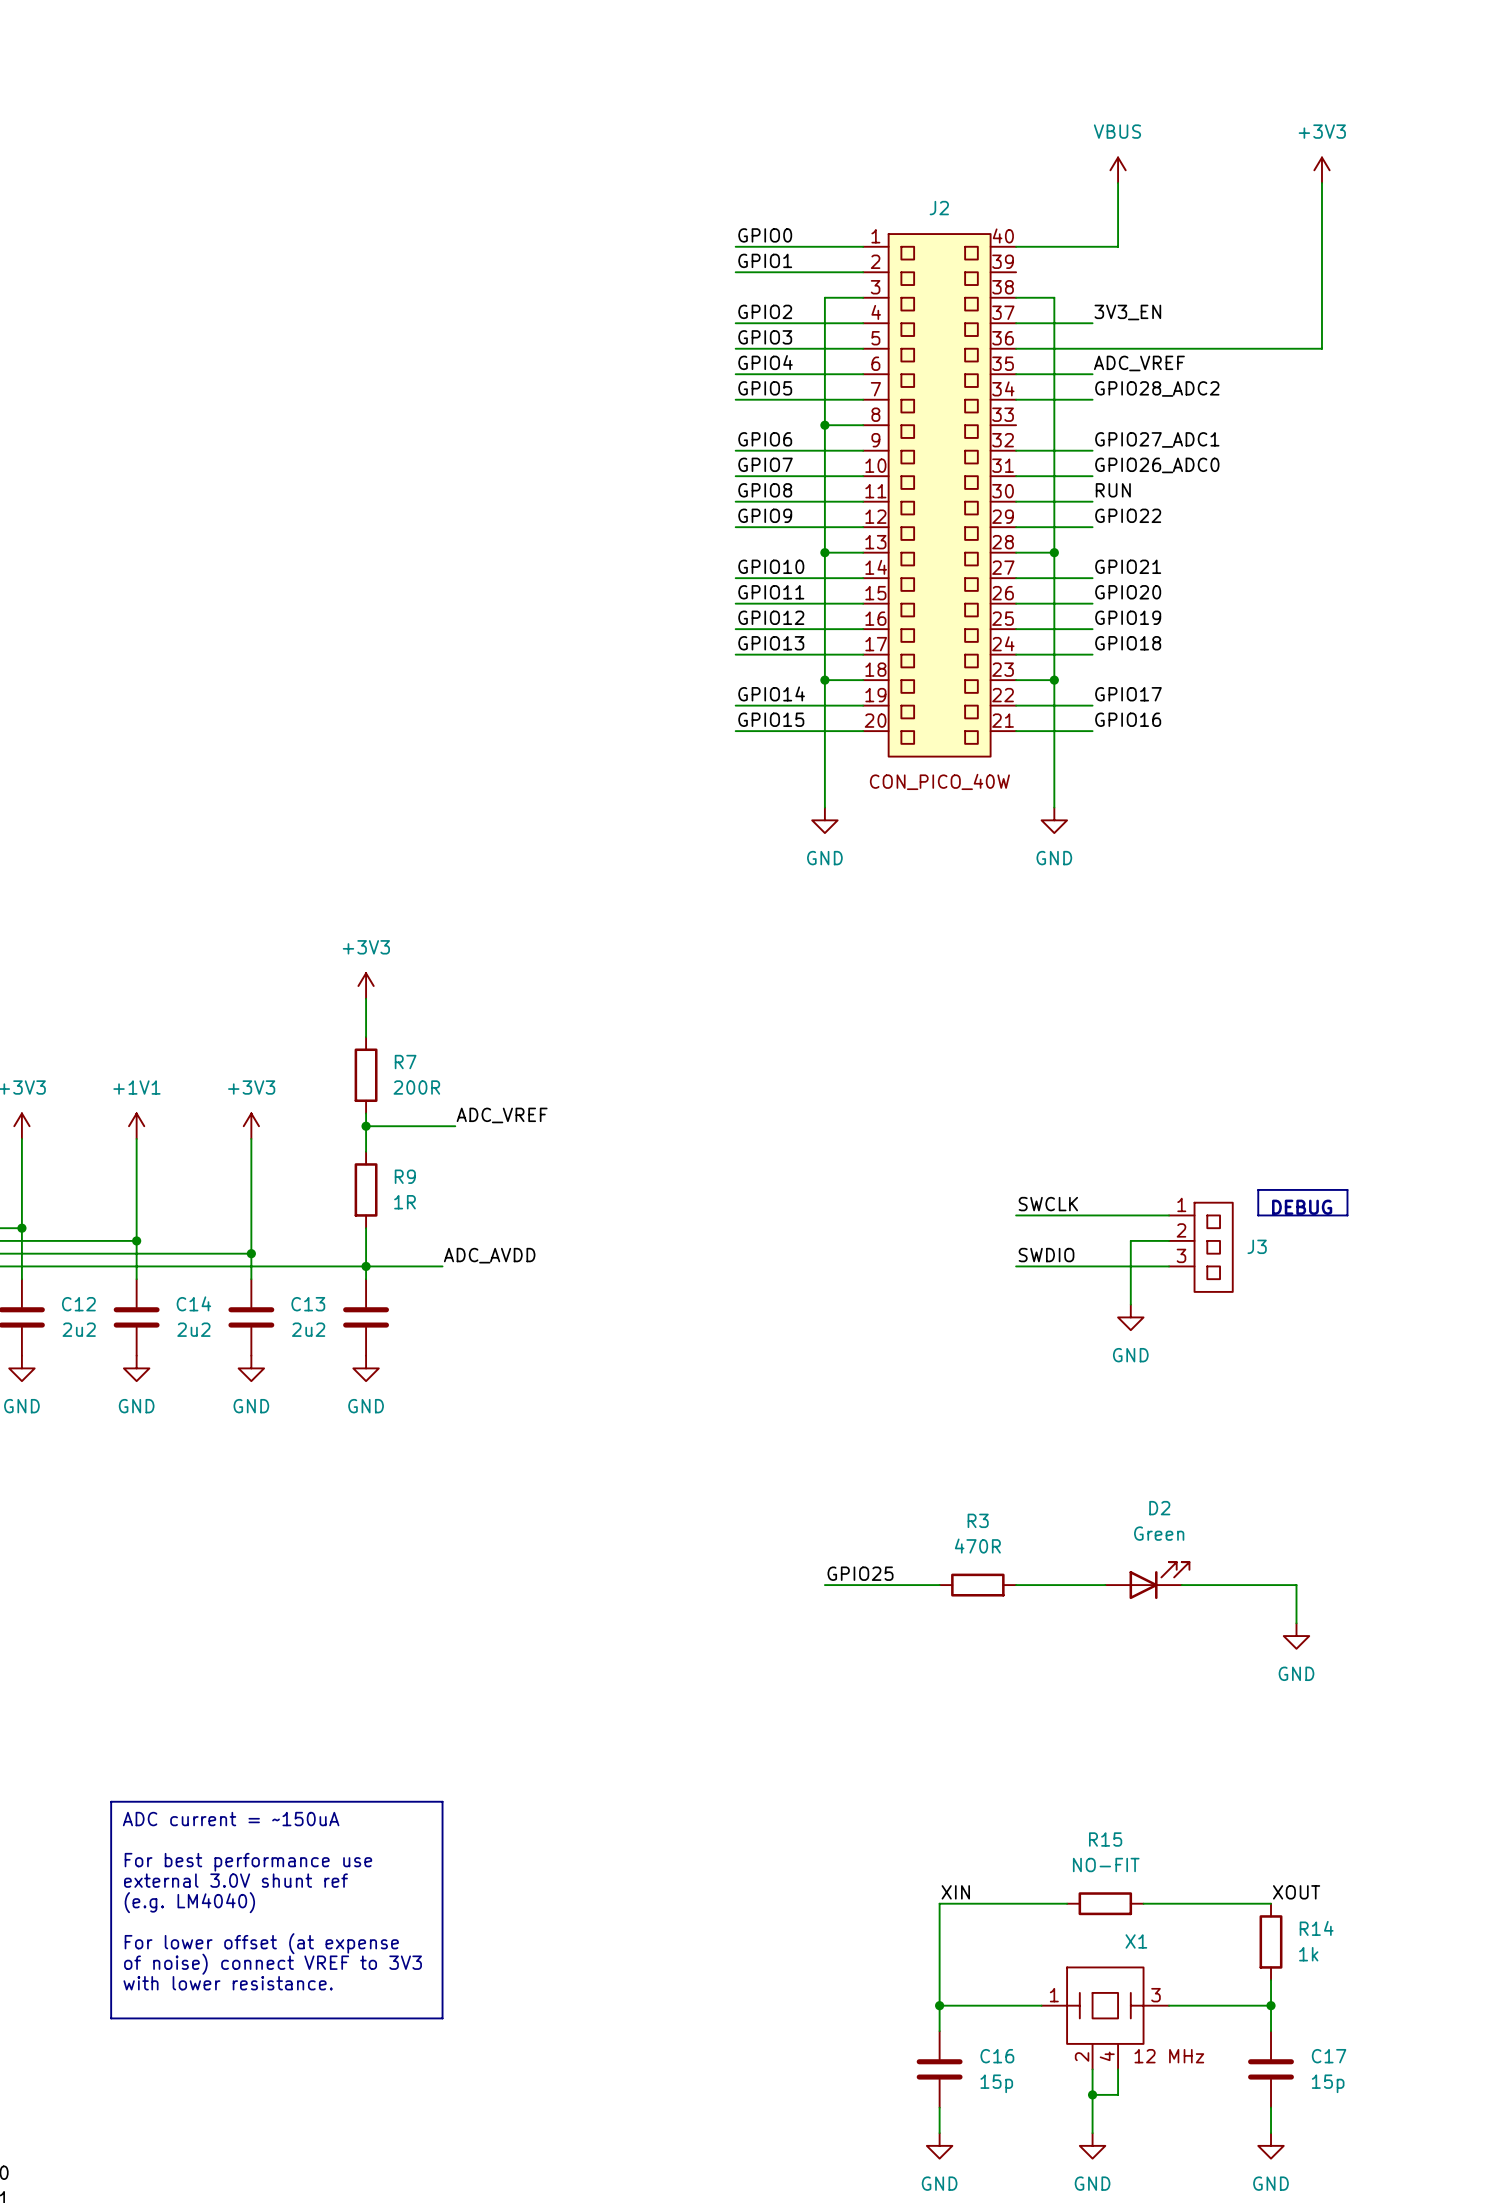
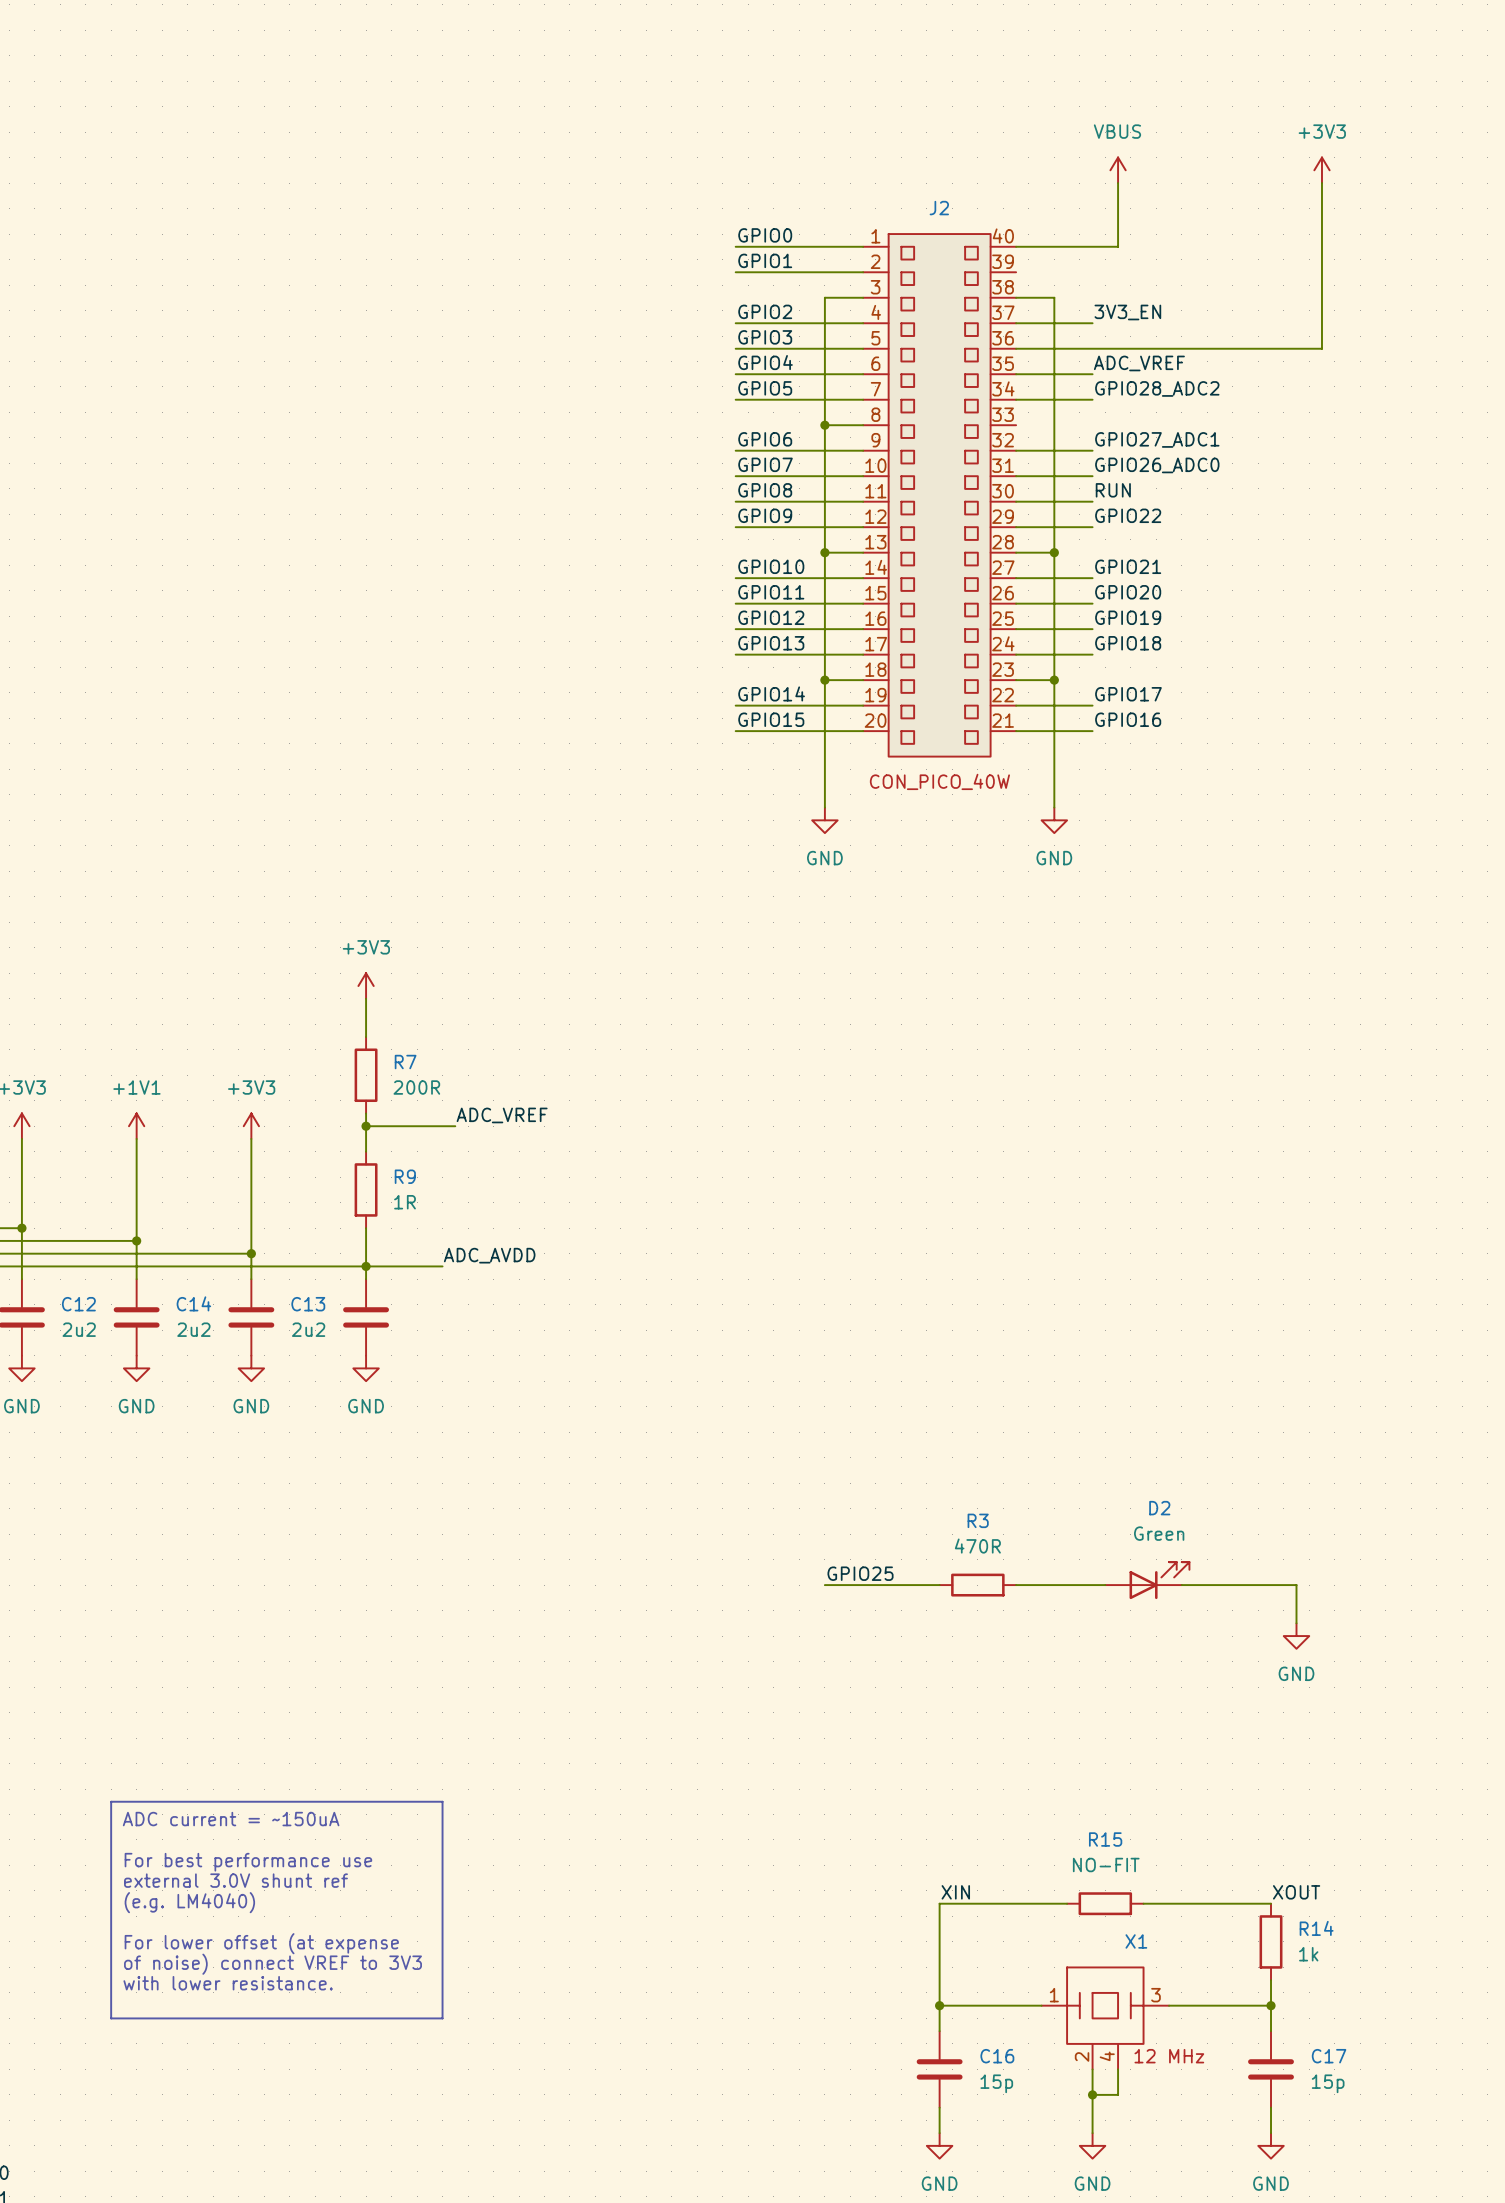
line: (1258, 1189) (1347, 1189) (1347, 1215) (1258, 1215) (1258, 1189) -> none
label: SWCLK (1048, 1204) -> none
text: DEBUG (1302, 1207) -> none
wire: (1016, 1215) (1169, 1215) -> none
wire: (1169, 1240) (1130, 1240) (1130, 1304) -> none
J3: (1200, 1247) -> none
label: SWDIO (1046, 1255) -> none
wire: (1016, 1266) (1169, 1266) -> none
power symbol: GND (1130, 1317) -> none

